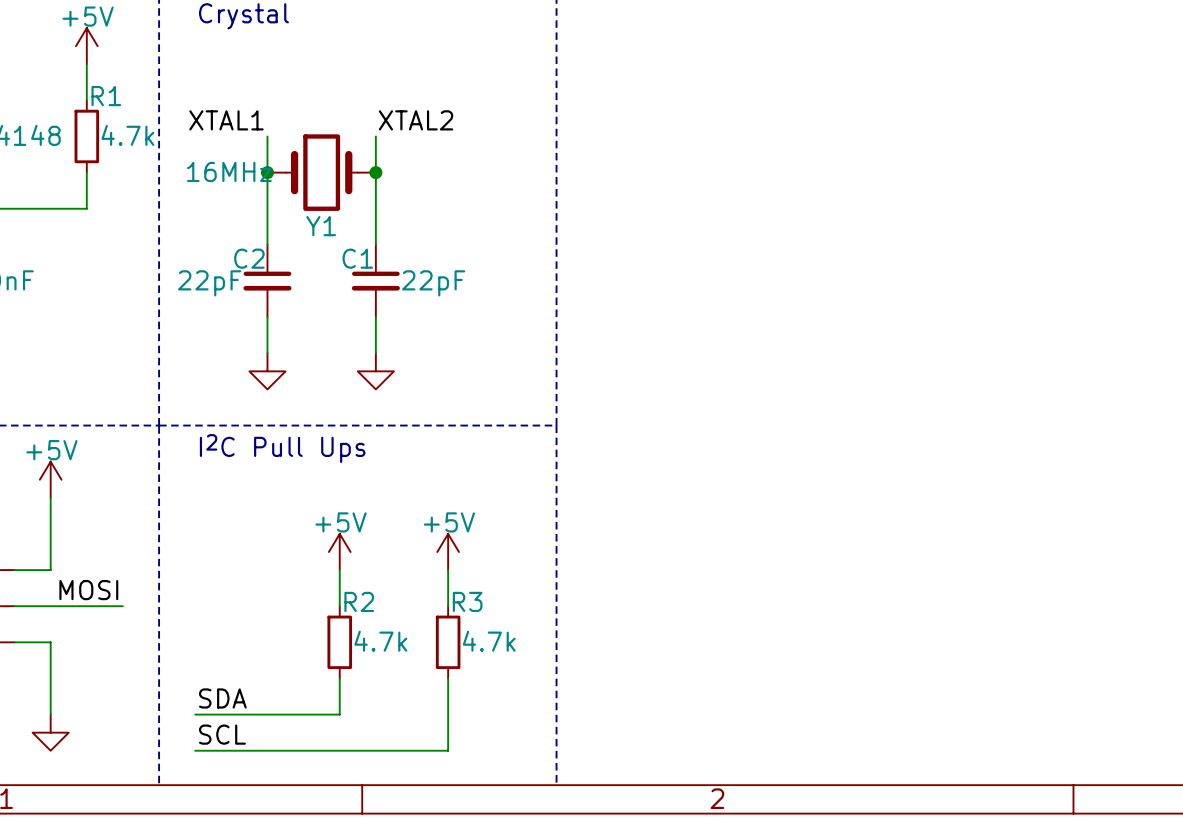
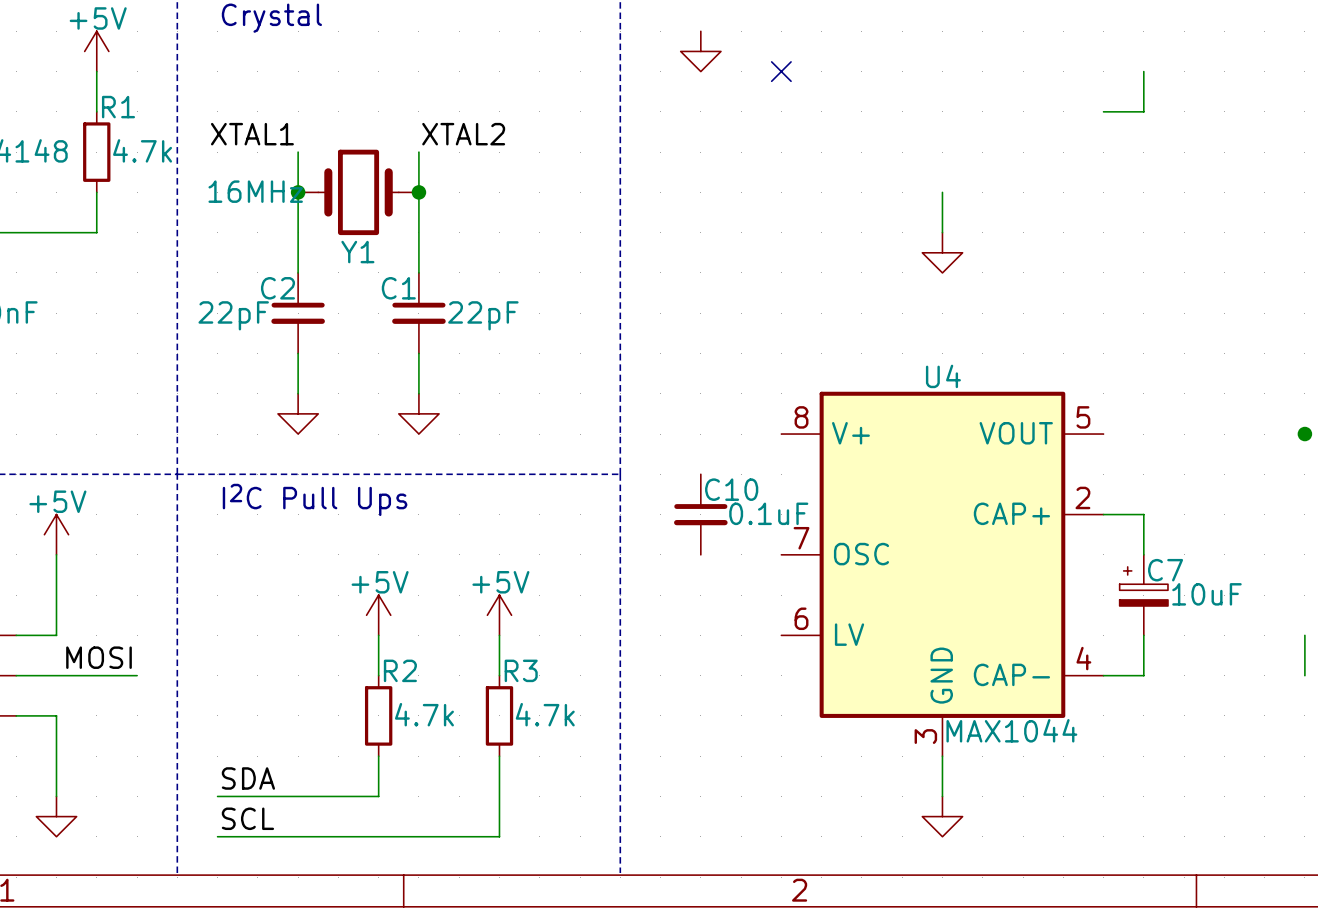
power symbol: none -> (700, 51)
no-connect mark: none -> (781, 71)
wire: none -> (1143, 71) (1143, 111) (1103, 111)
wire: none -> (942, 192) (942, 232)
power symbol: none -> (942, 252)
junction: none -> (1304, 434)
C10: none -> 0.1uF (700, 514)
wire: none -> (1103, 514) (1143, 514) (1143, 554)
U4: none -> MAX1044 (942, 573)
C7: none -> 10uF (1143, 595)
wire: none -> (1143, 635) (1143, 675) (1103, 675)
wire: none -> (1304, 635) (1304, 675)
wire: none -> (942, 756) (942, 796)
power symbol: none -> (942, 816)

